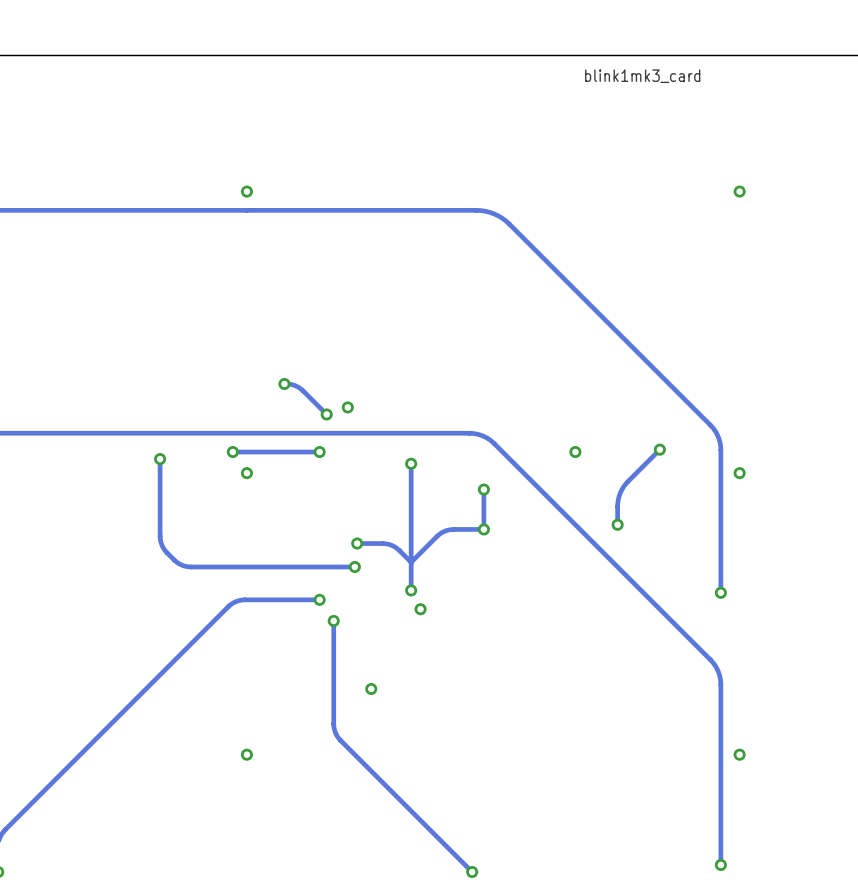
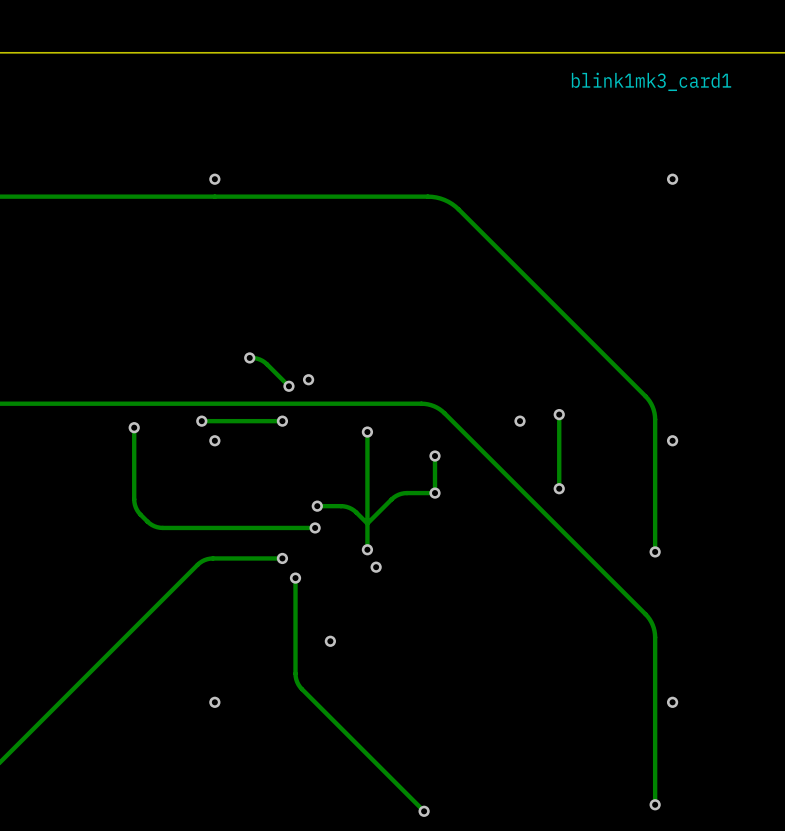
text: blink1mk3_card (642, 76) -> blink1mk3_card1 (651, 81)
track: (659, 449) (625, 484) (619, 496) (617, 506) -> (559, 414) (559, 471)
via position: (659, 449) -> (559, 414)

